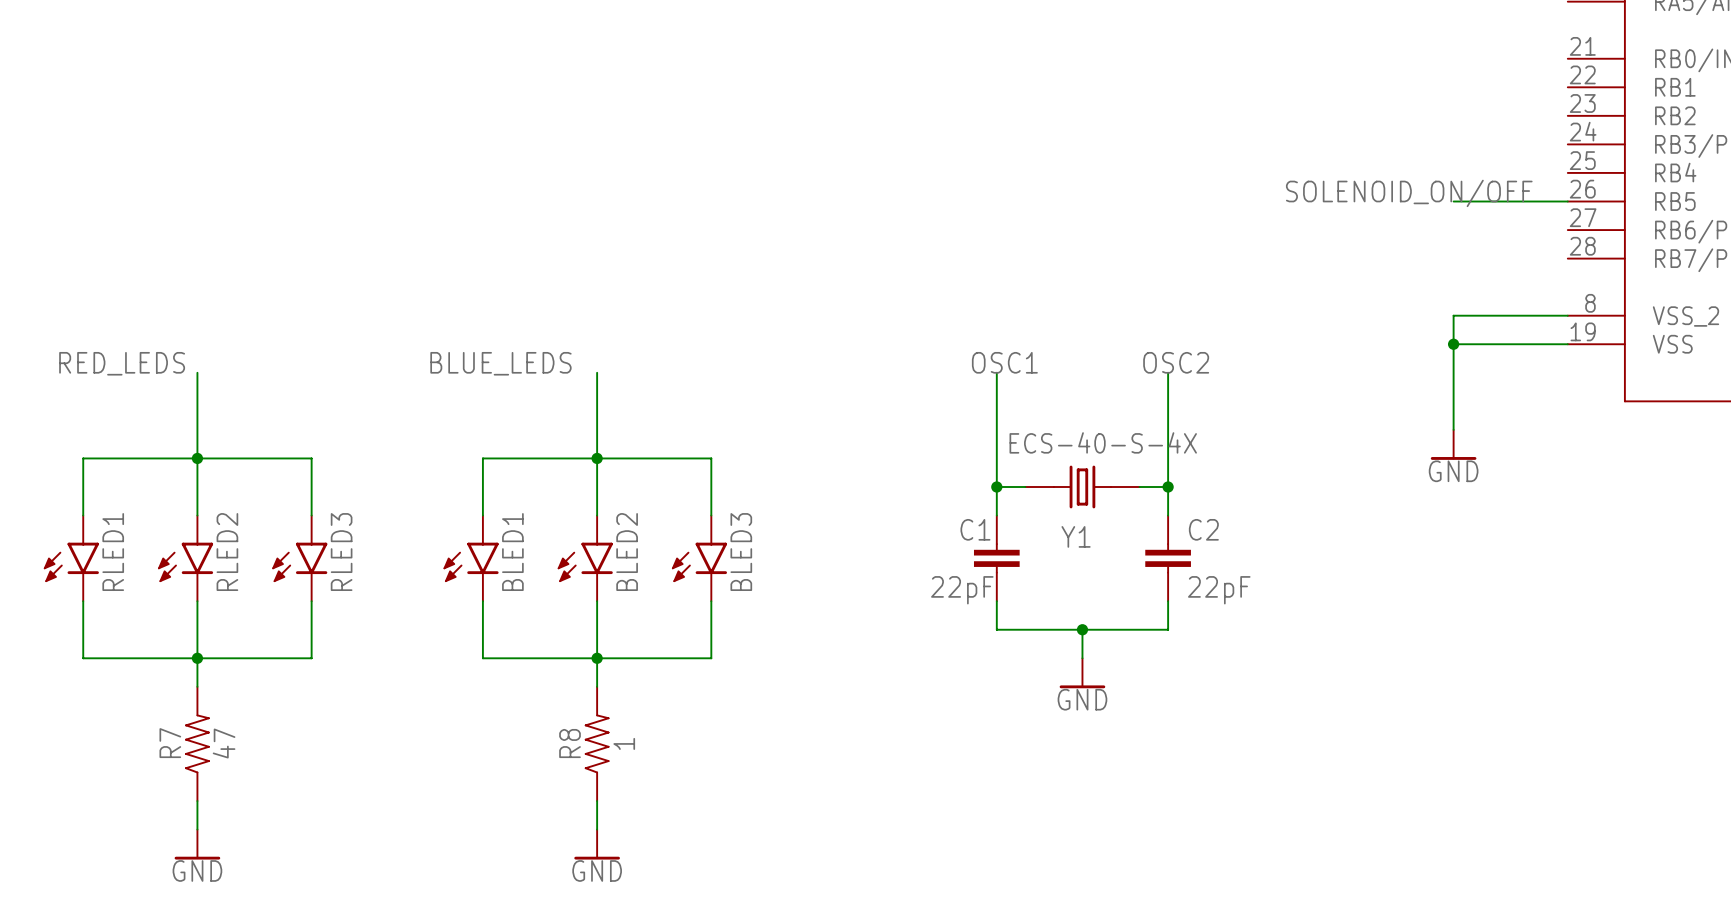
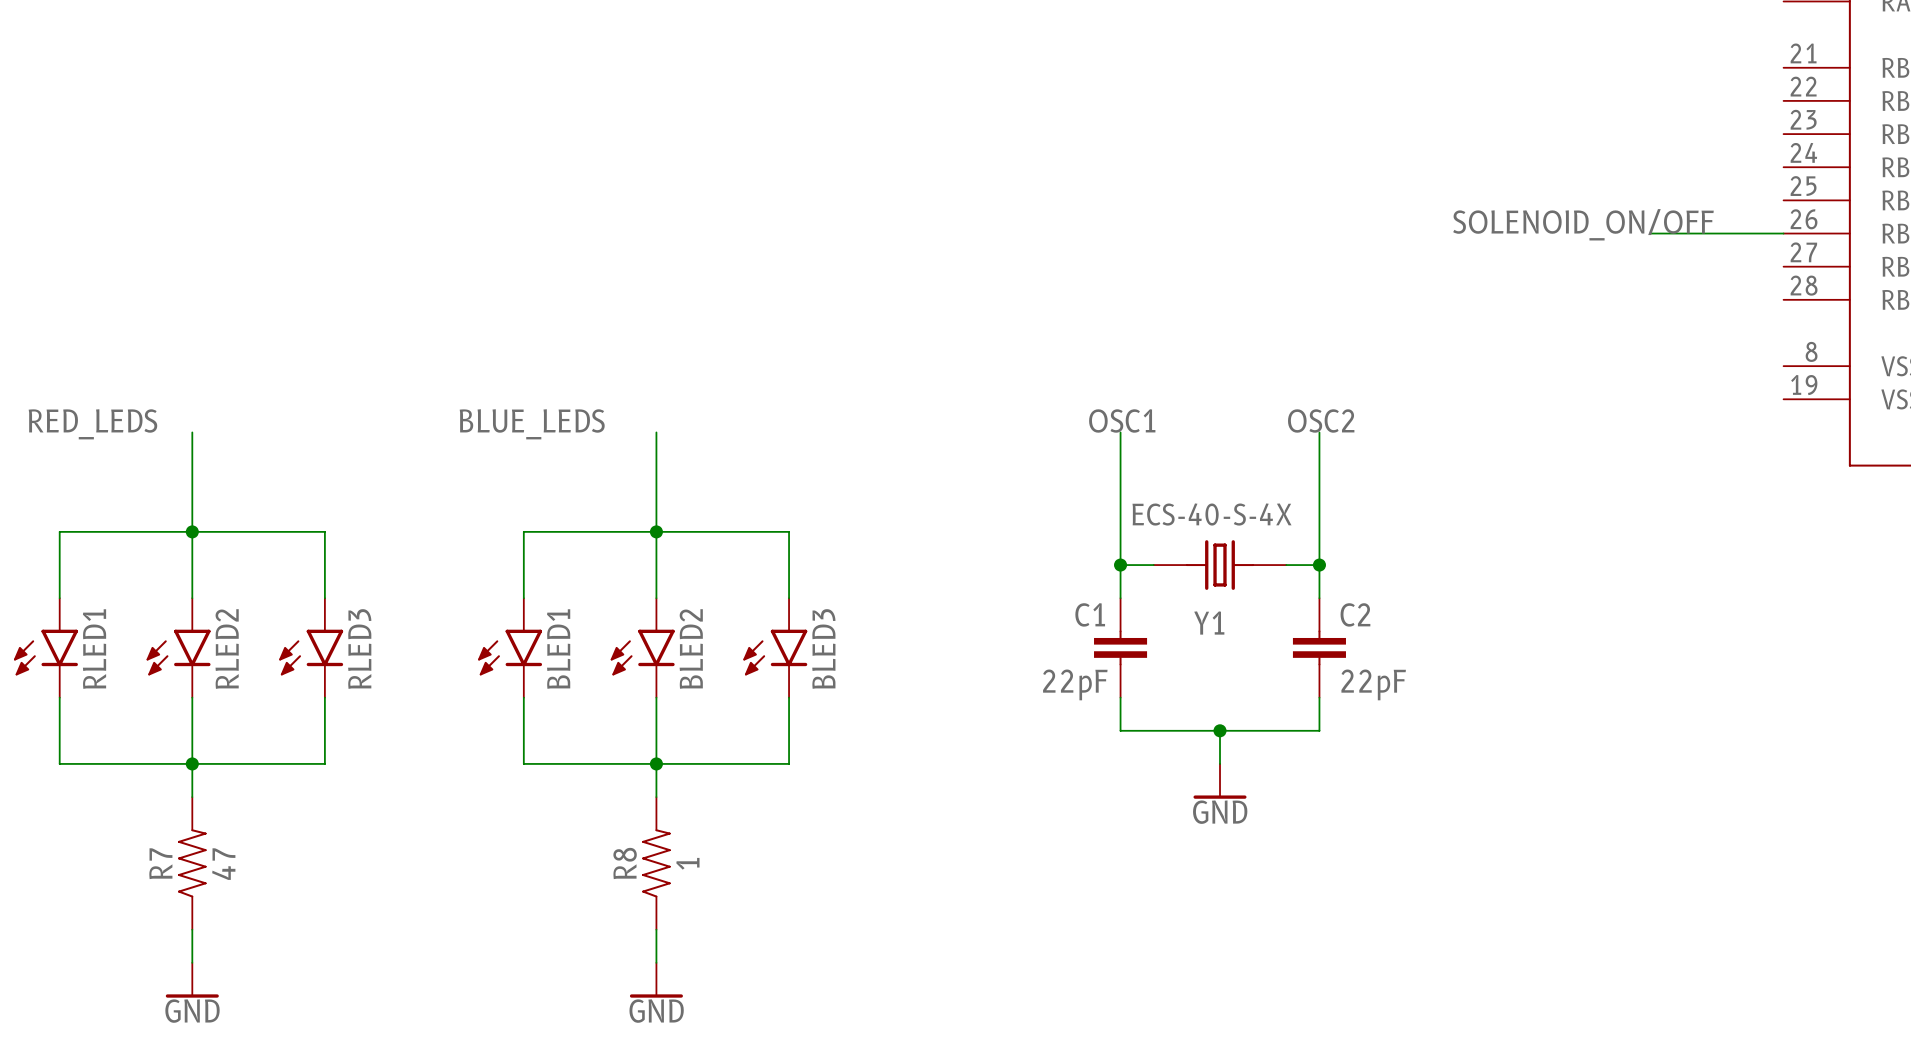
wire: (1567, 315) (1453, 315) (1453, 429) -> none
wire: (1453, 344) (1567, 344) -> none
junction: (1453, 344) -> none
power symbol: GND (1453, 444) -> none

